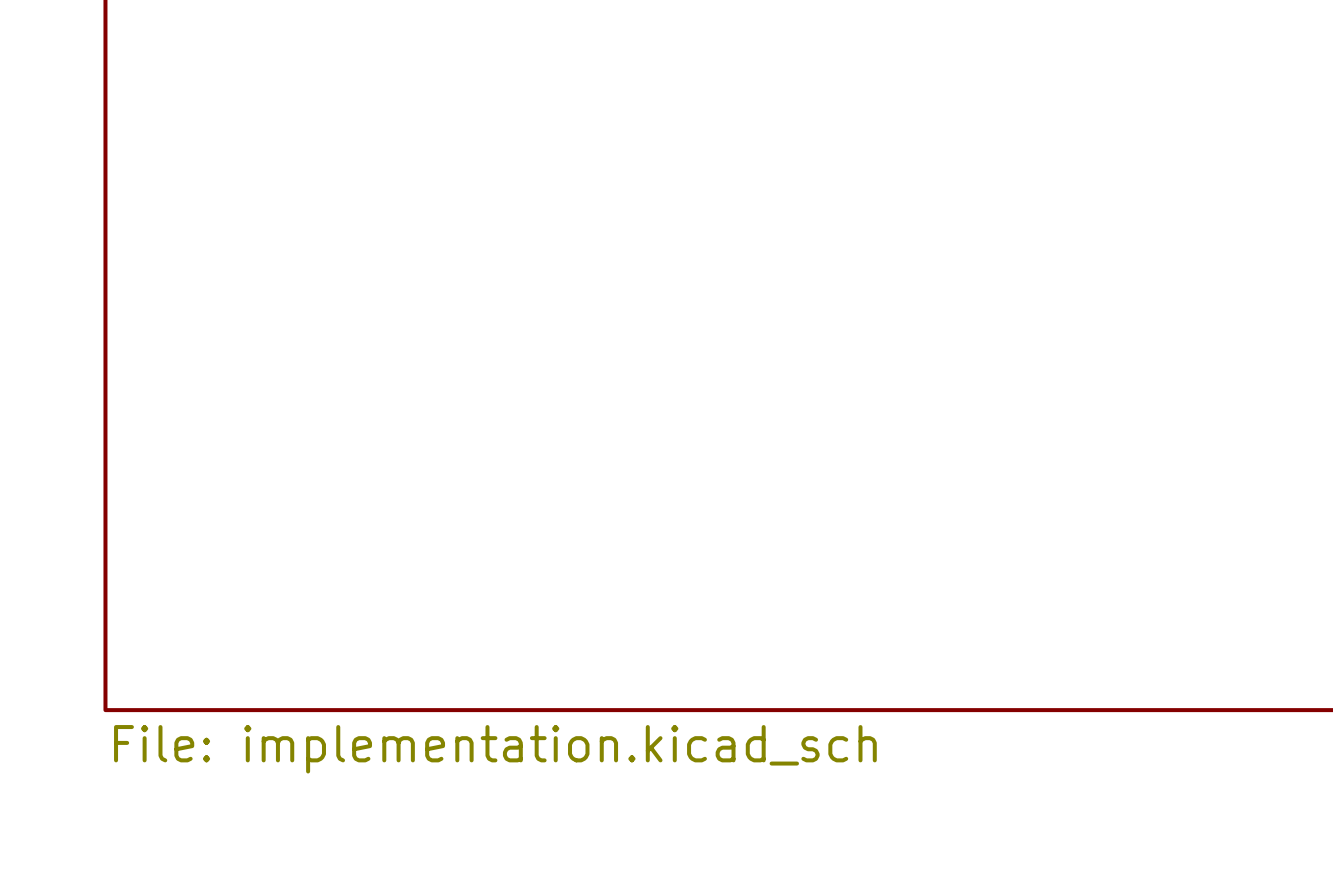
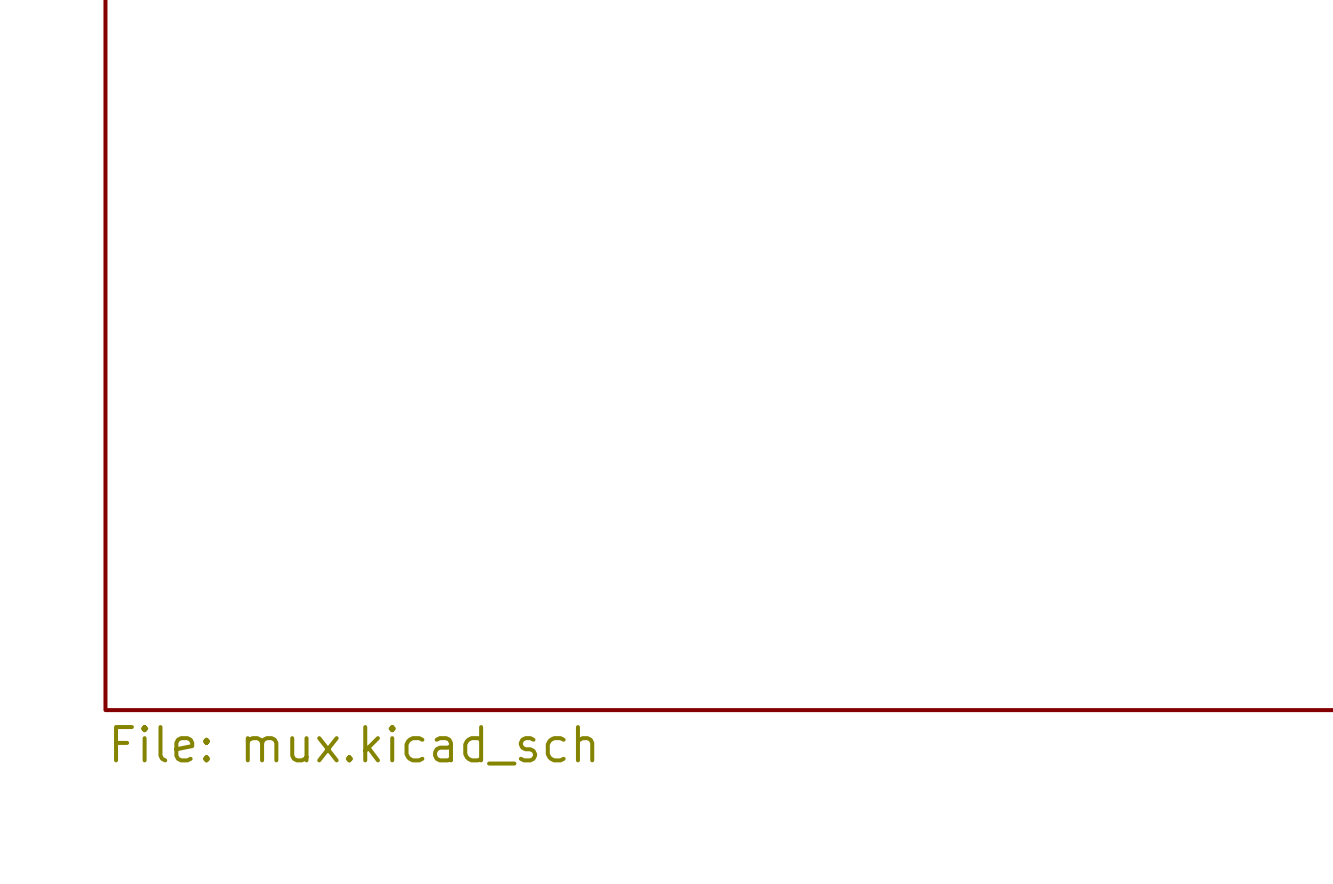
sheet value: File: implementation.kicad_sch (495, 749) -> File: mux.kicad_sch (354, 745)

